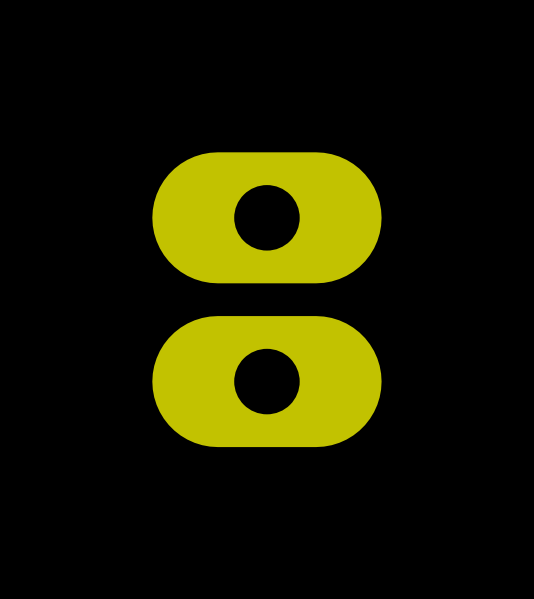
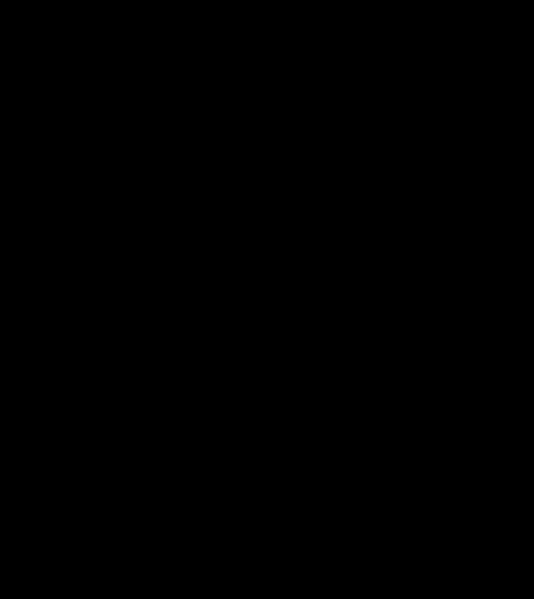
part: (266, 299) -> none

